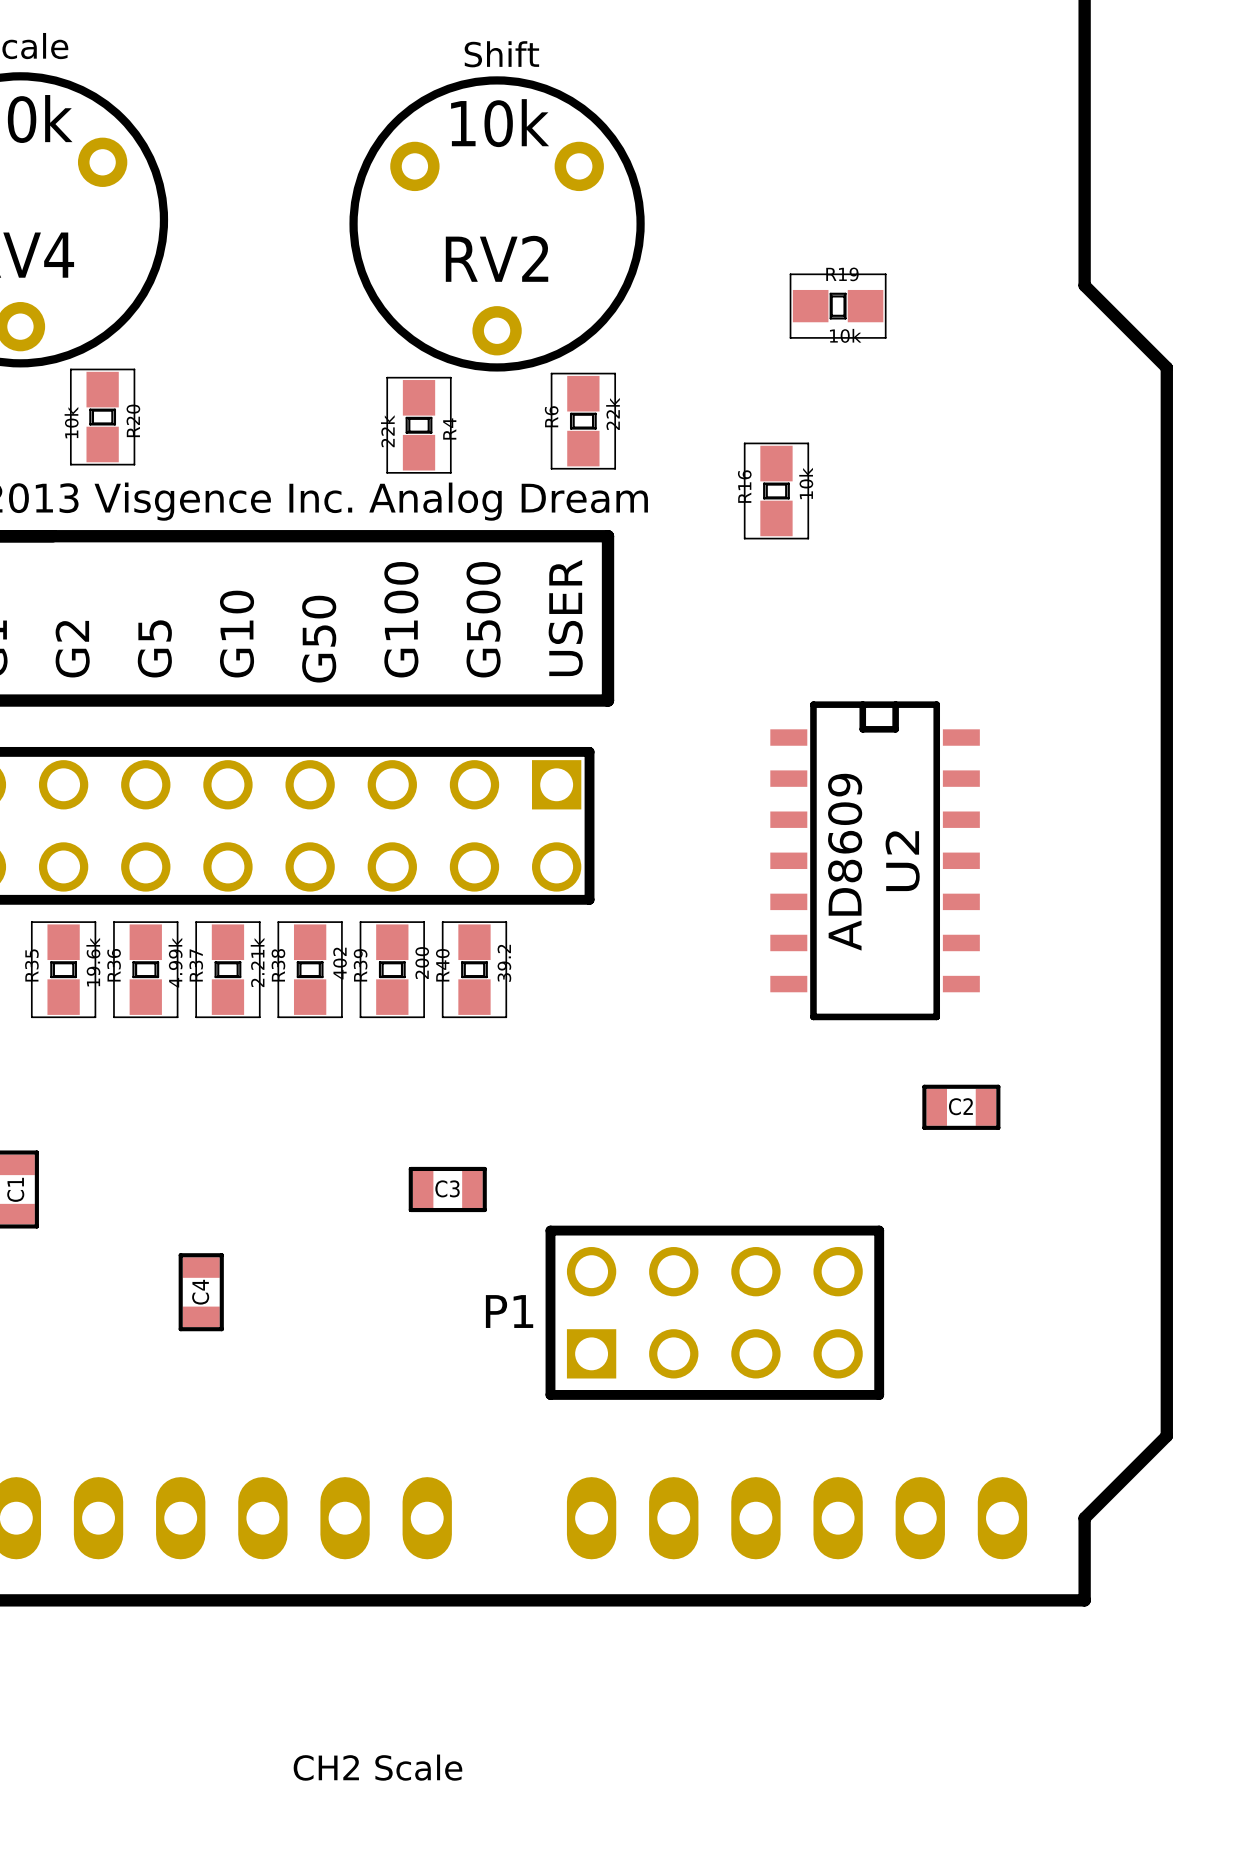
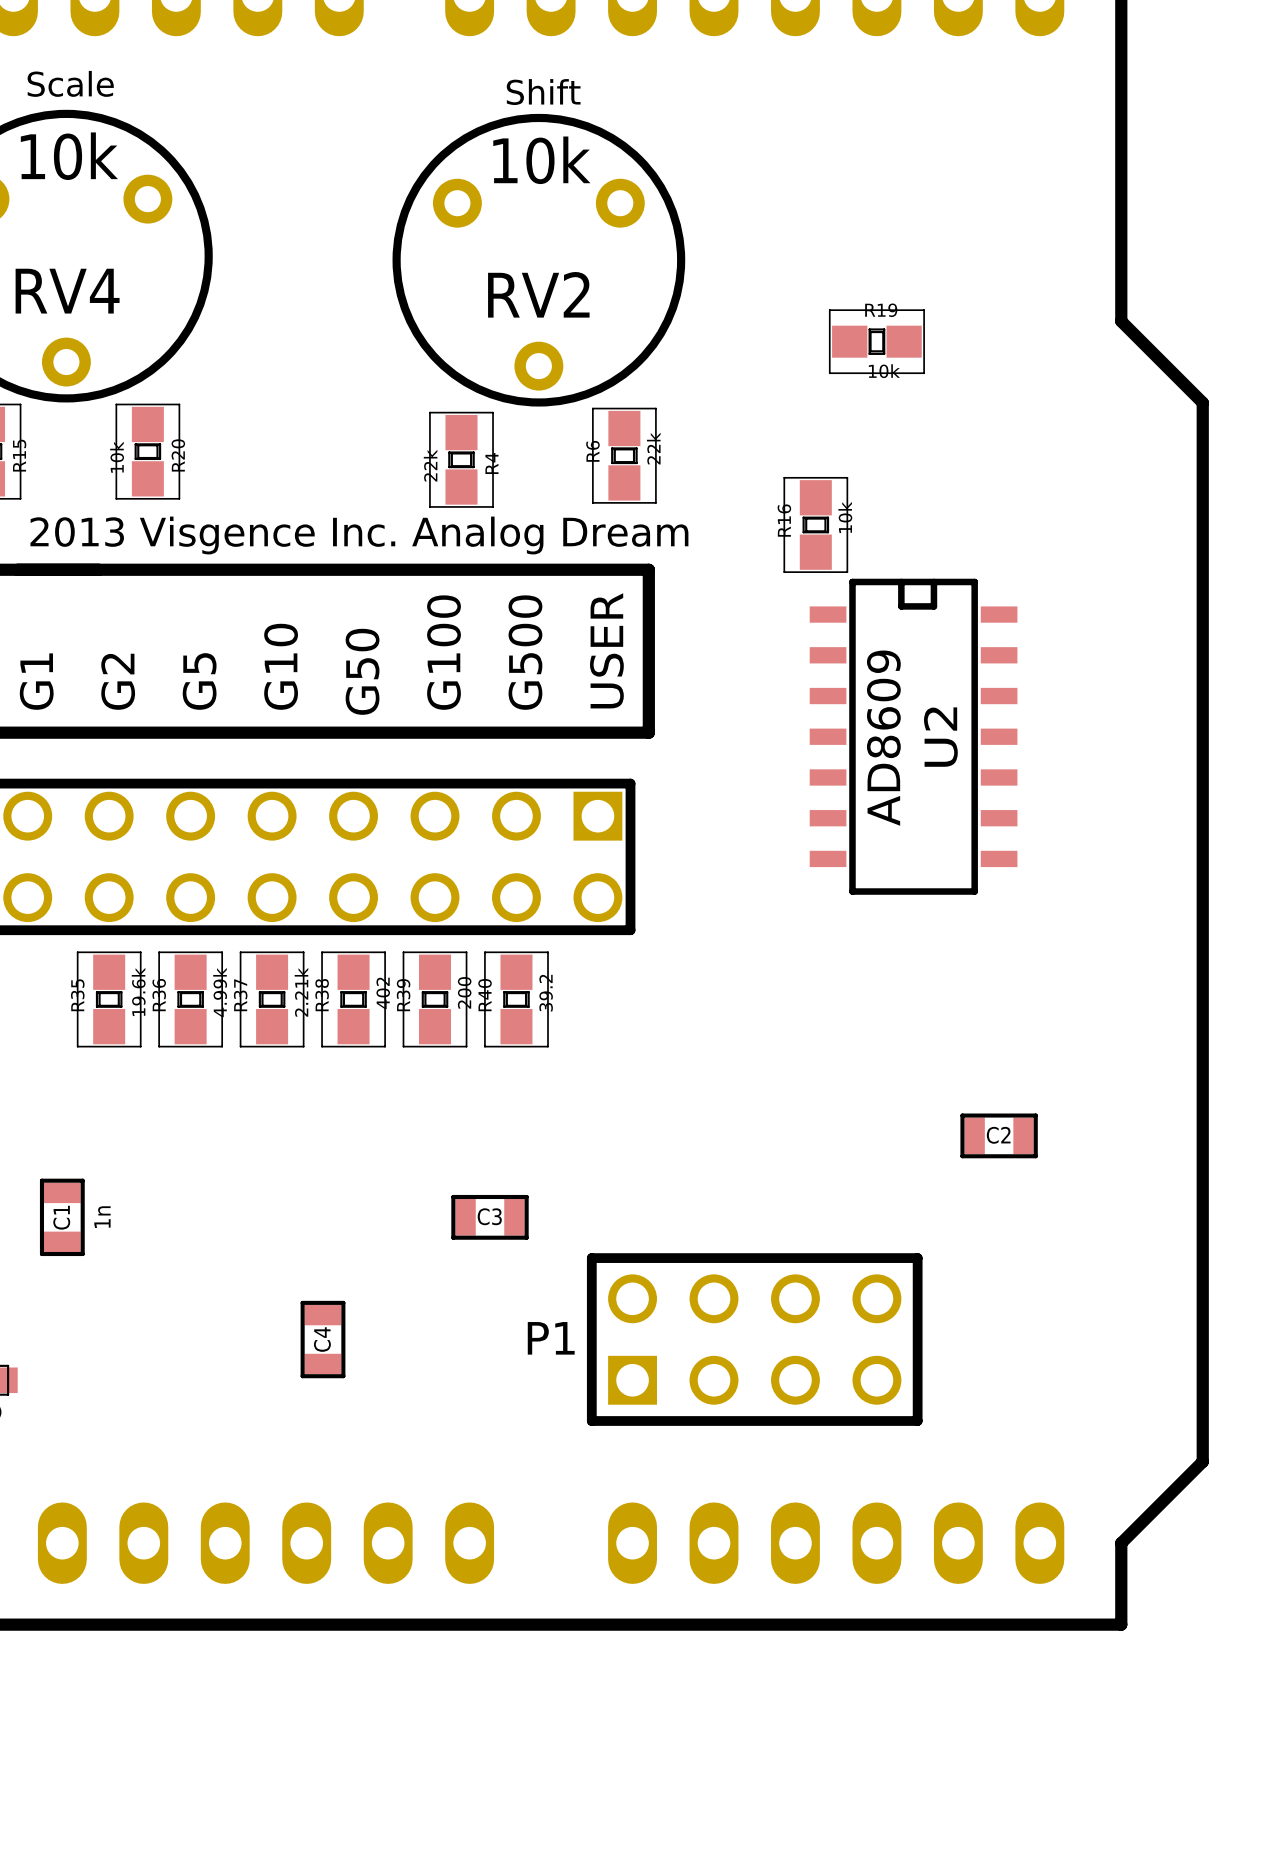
U2 position: (875, 860) -> (913, 736)
C1 value: none -> 1n (102, 1217)
C4 position: (201, 1292) -> (323, 1339)
text: CH2 Scale (377, 1767) -> none

